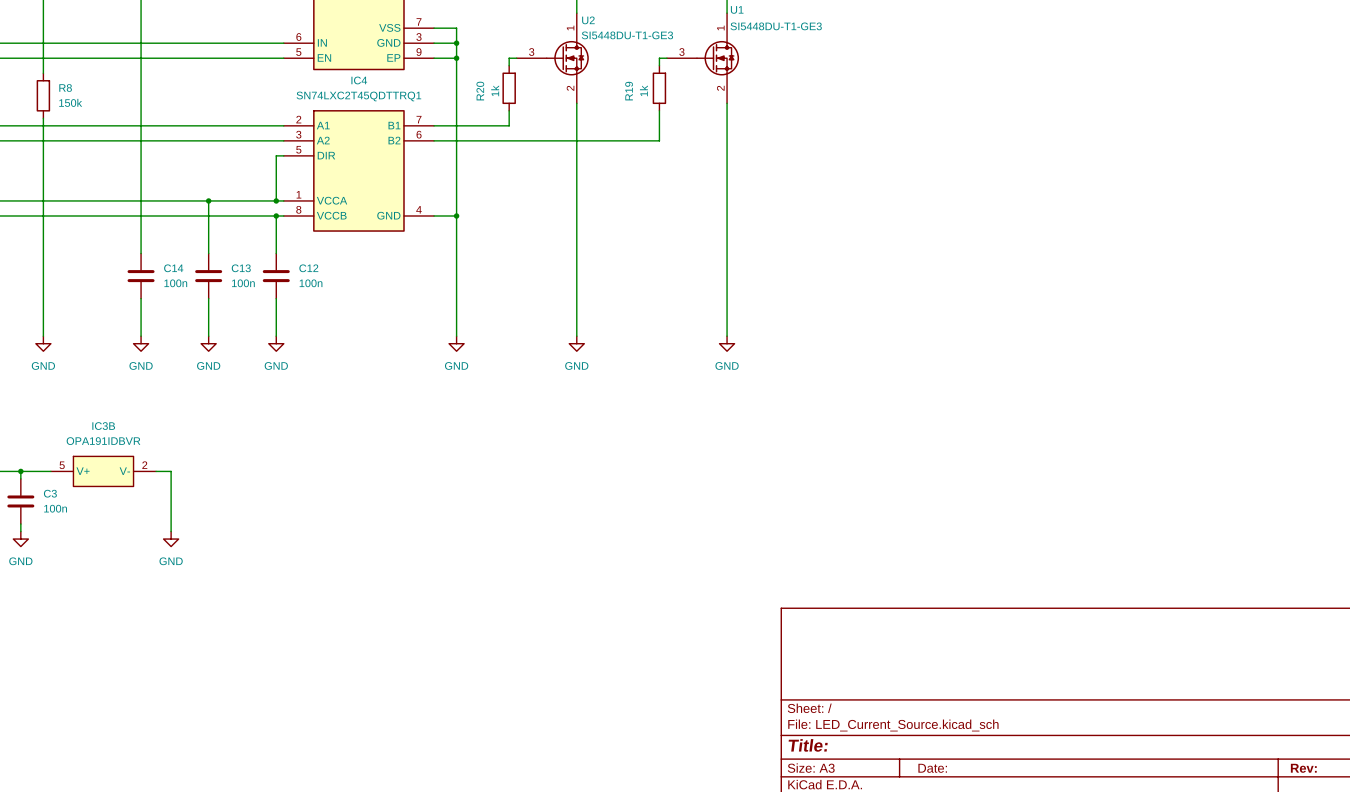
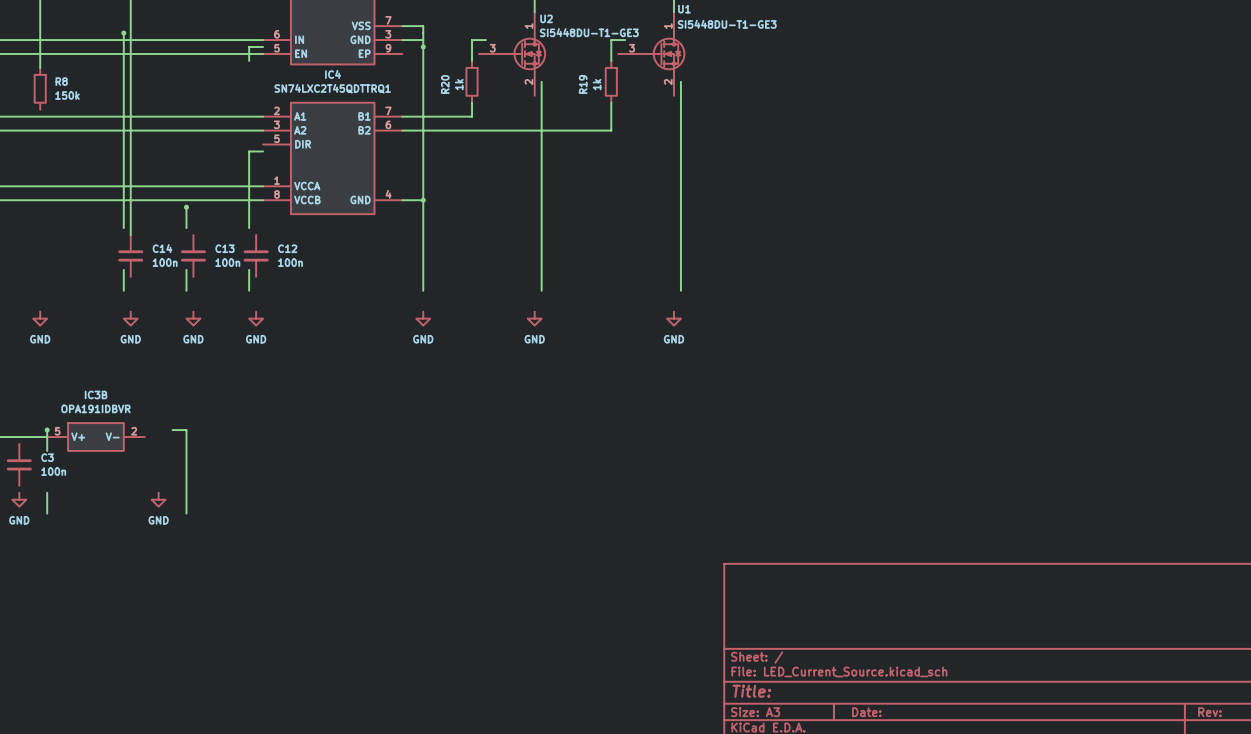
wire: none -> (123, 33) (123, 228)
junction: none -> (123, 33)
junction: (456, 43) -> none
wire: none -> (263, 47) (249, 47) (249, 60)
junction: none -> (423, 47)
wire: (434, 58) (456, 58) -> none
junction: (456, 58) -> none
wire: (509, 58) (516, 58) -> (472, 53) (472, 40) (485, 40)
wire: (659, 58) (666, 58) -> (611, 53) (611, 40) (625, 40)
wire: none -> (541, 81) (541, 290)
wire: none -> (680, 81) (680, 290)
wire: (576, 103) (576, 336) -> none
wire: (727, 103) (727, 336) -> none
wire: (43, 118) (43, 336) -> none
wire: (283, 155) (276, 155) (276, 200) -> none
wire: none -> (263, 151) (249, 151) (249, 228)
wire: (208, 200) (208, 253) -> none
junction position: (208, 200) -> (186, 207)
junction: (276, 200) -> none
wire: (276, 215) (276, 253) -> none
junction: (276, 215) -> none
wire: none -> (186, 207) (186, 228)
wire: none -> (123, 269) (123, 290)
wire: none -> (186, 269) (186, 290)
wire: none -> (249, 269) (249, 290)
wire: (141, 298) (141, 336) -> none
wire: (208, 298) (208, 336) -> none
wire: (276, 298) (276, 336) -> none
wire: (456, 313) (456, 336) -> none
wire: none -> (47, 430) (47, 450)
junction: none -> (47, 430)
wire: none -> (172, 430) (186, 430) (186, 513)
wire: (20, 471) (20, 478) -> none
junction: (20, 471) -> none
wire: (156, 471) (171, 471) (171, 531) -> none
wire: (20, 524) (20, 531) -> none
wire: none -> (47, 492) (47, 513)

